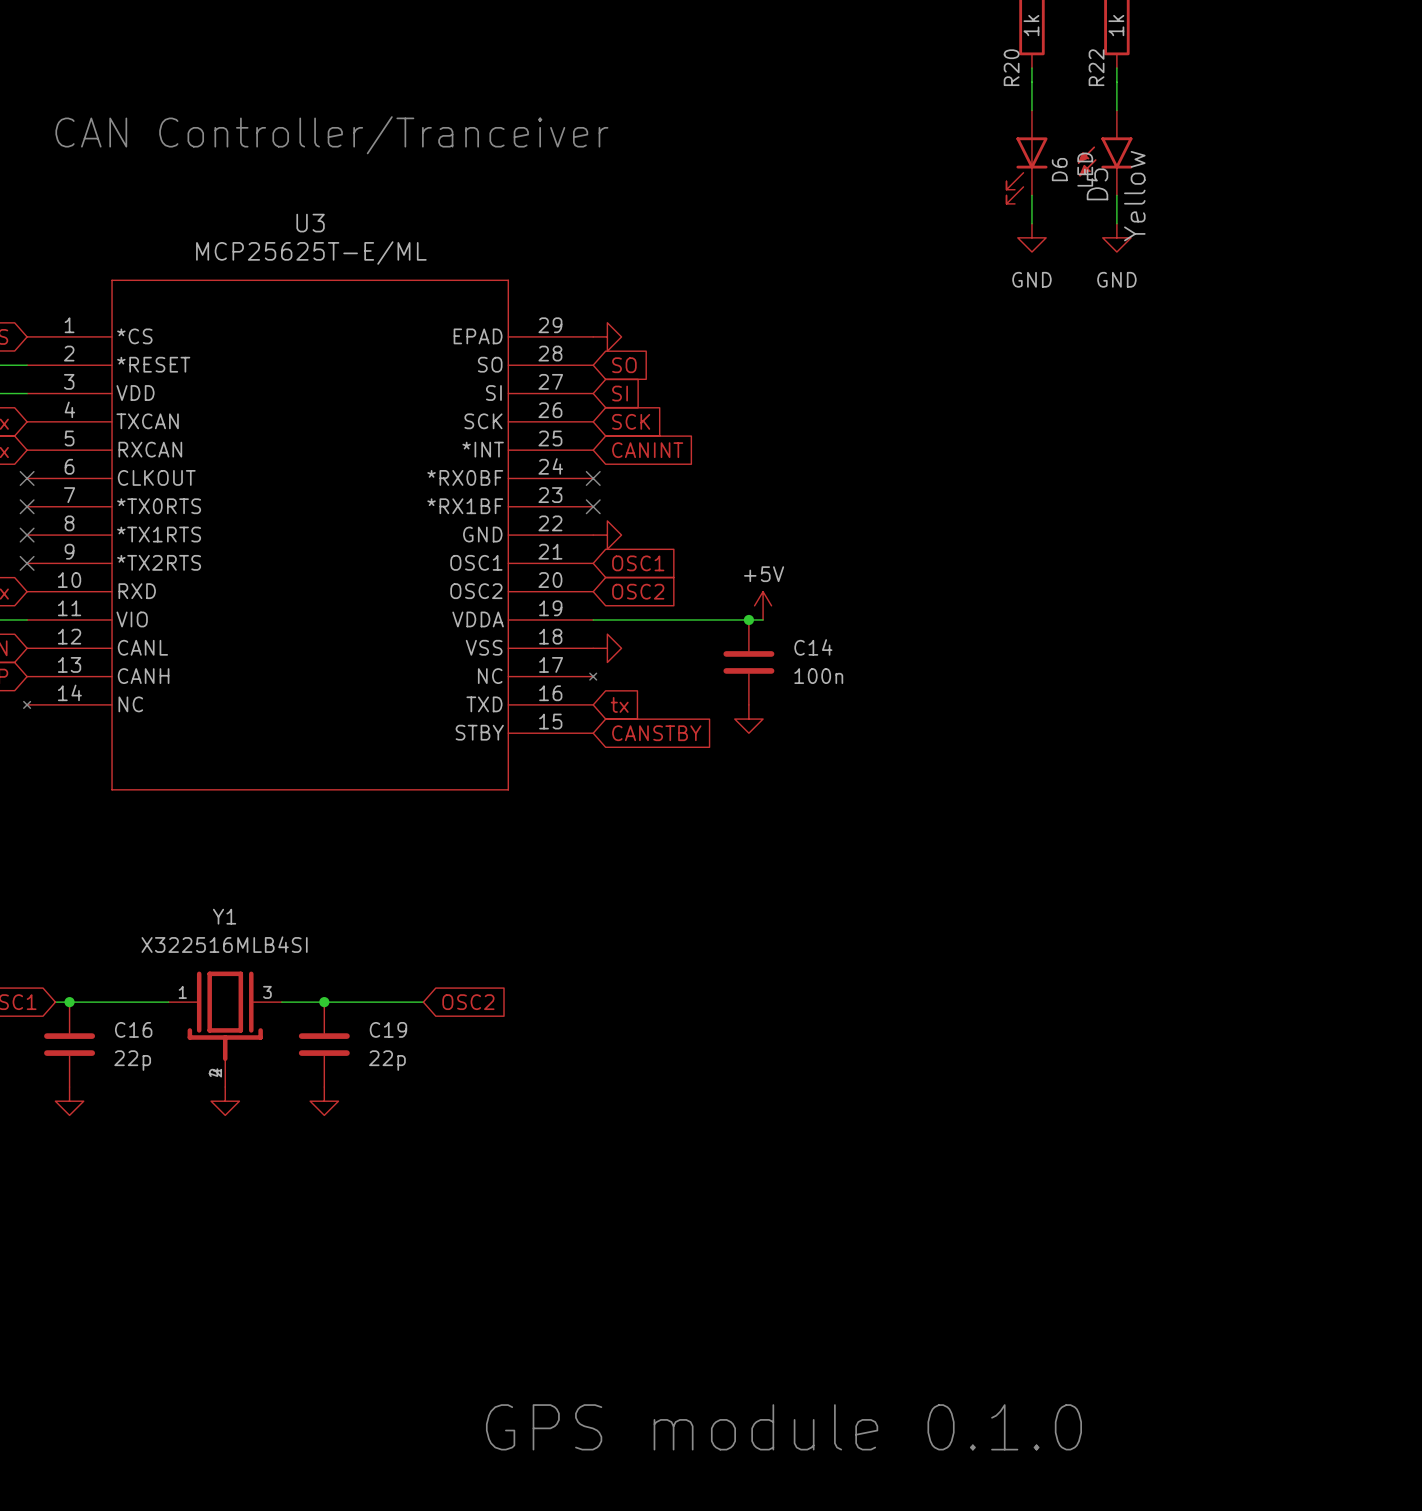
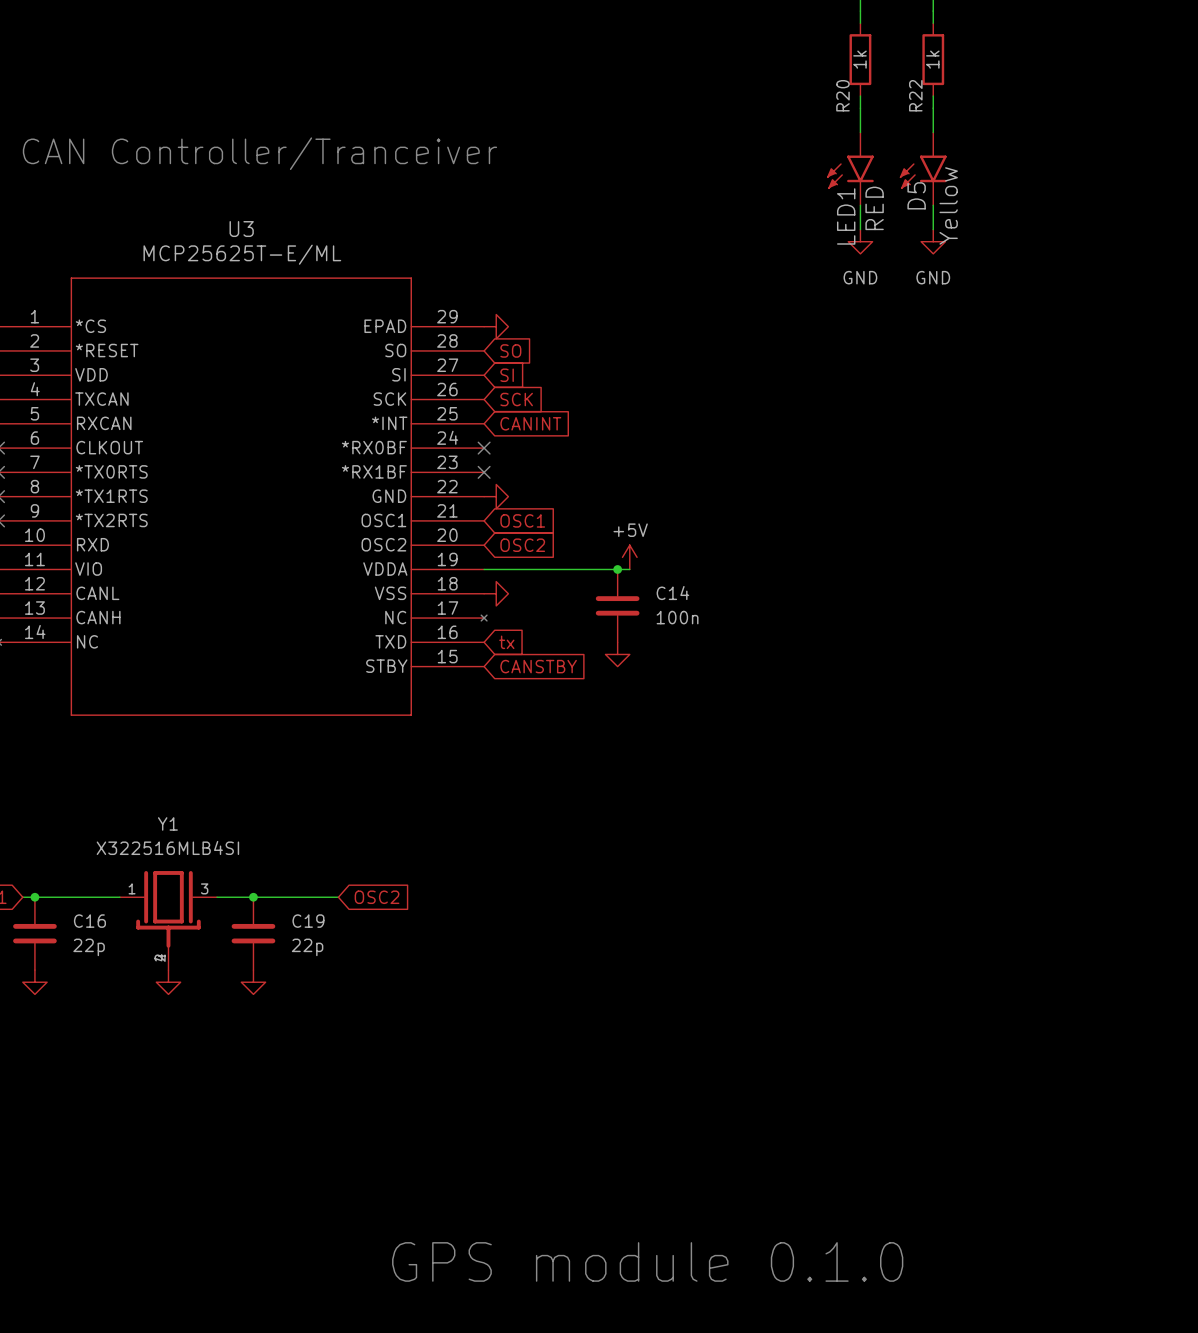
LED1: none -> RED (850, 168)
D6: LED (1027, 157) -> none

